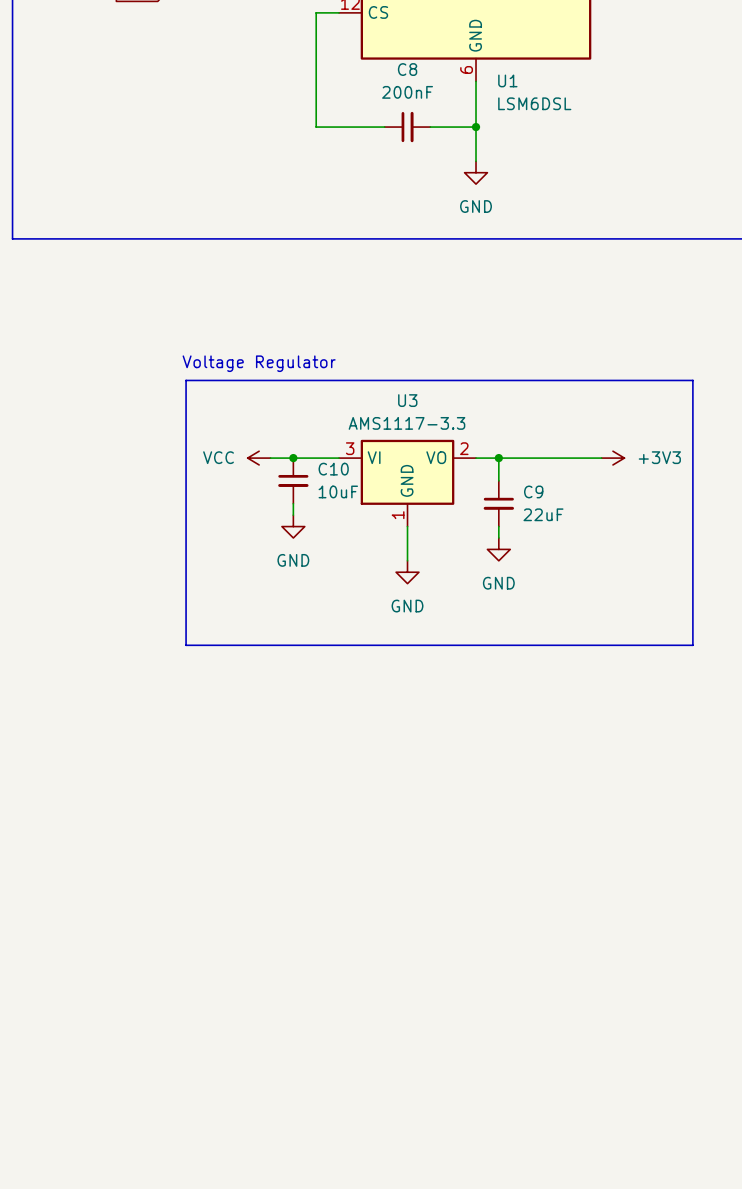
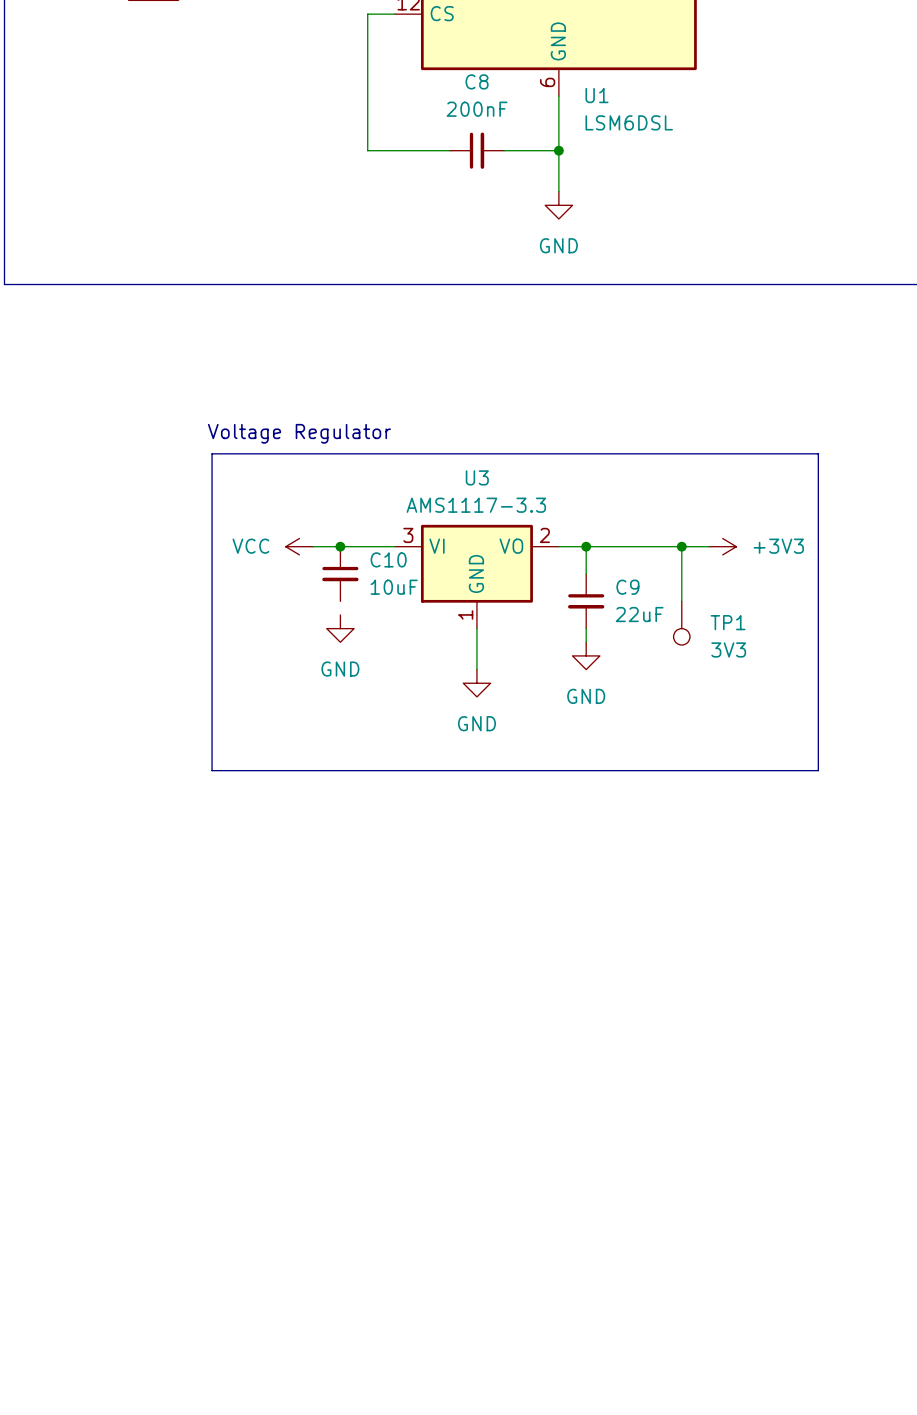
wire: none -> (681, 546) (681, 601)
junction: none -> (681, 546)
wire: (293, 503) (293, 515) -> none
TP1: none -> 3V3 (681, 623)

